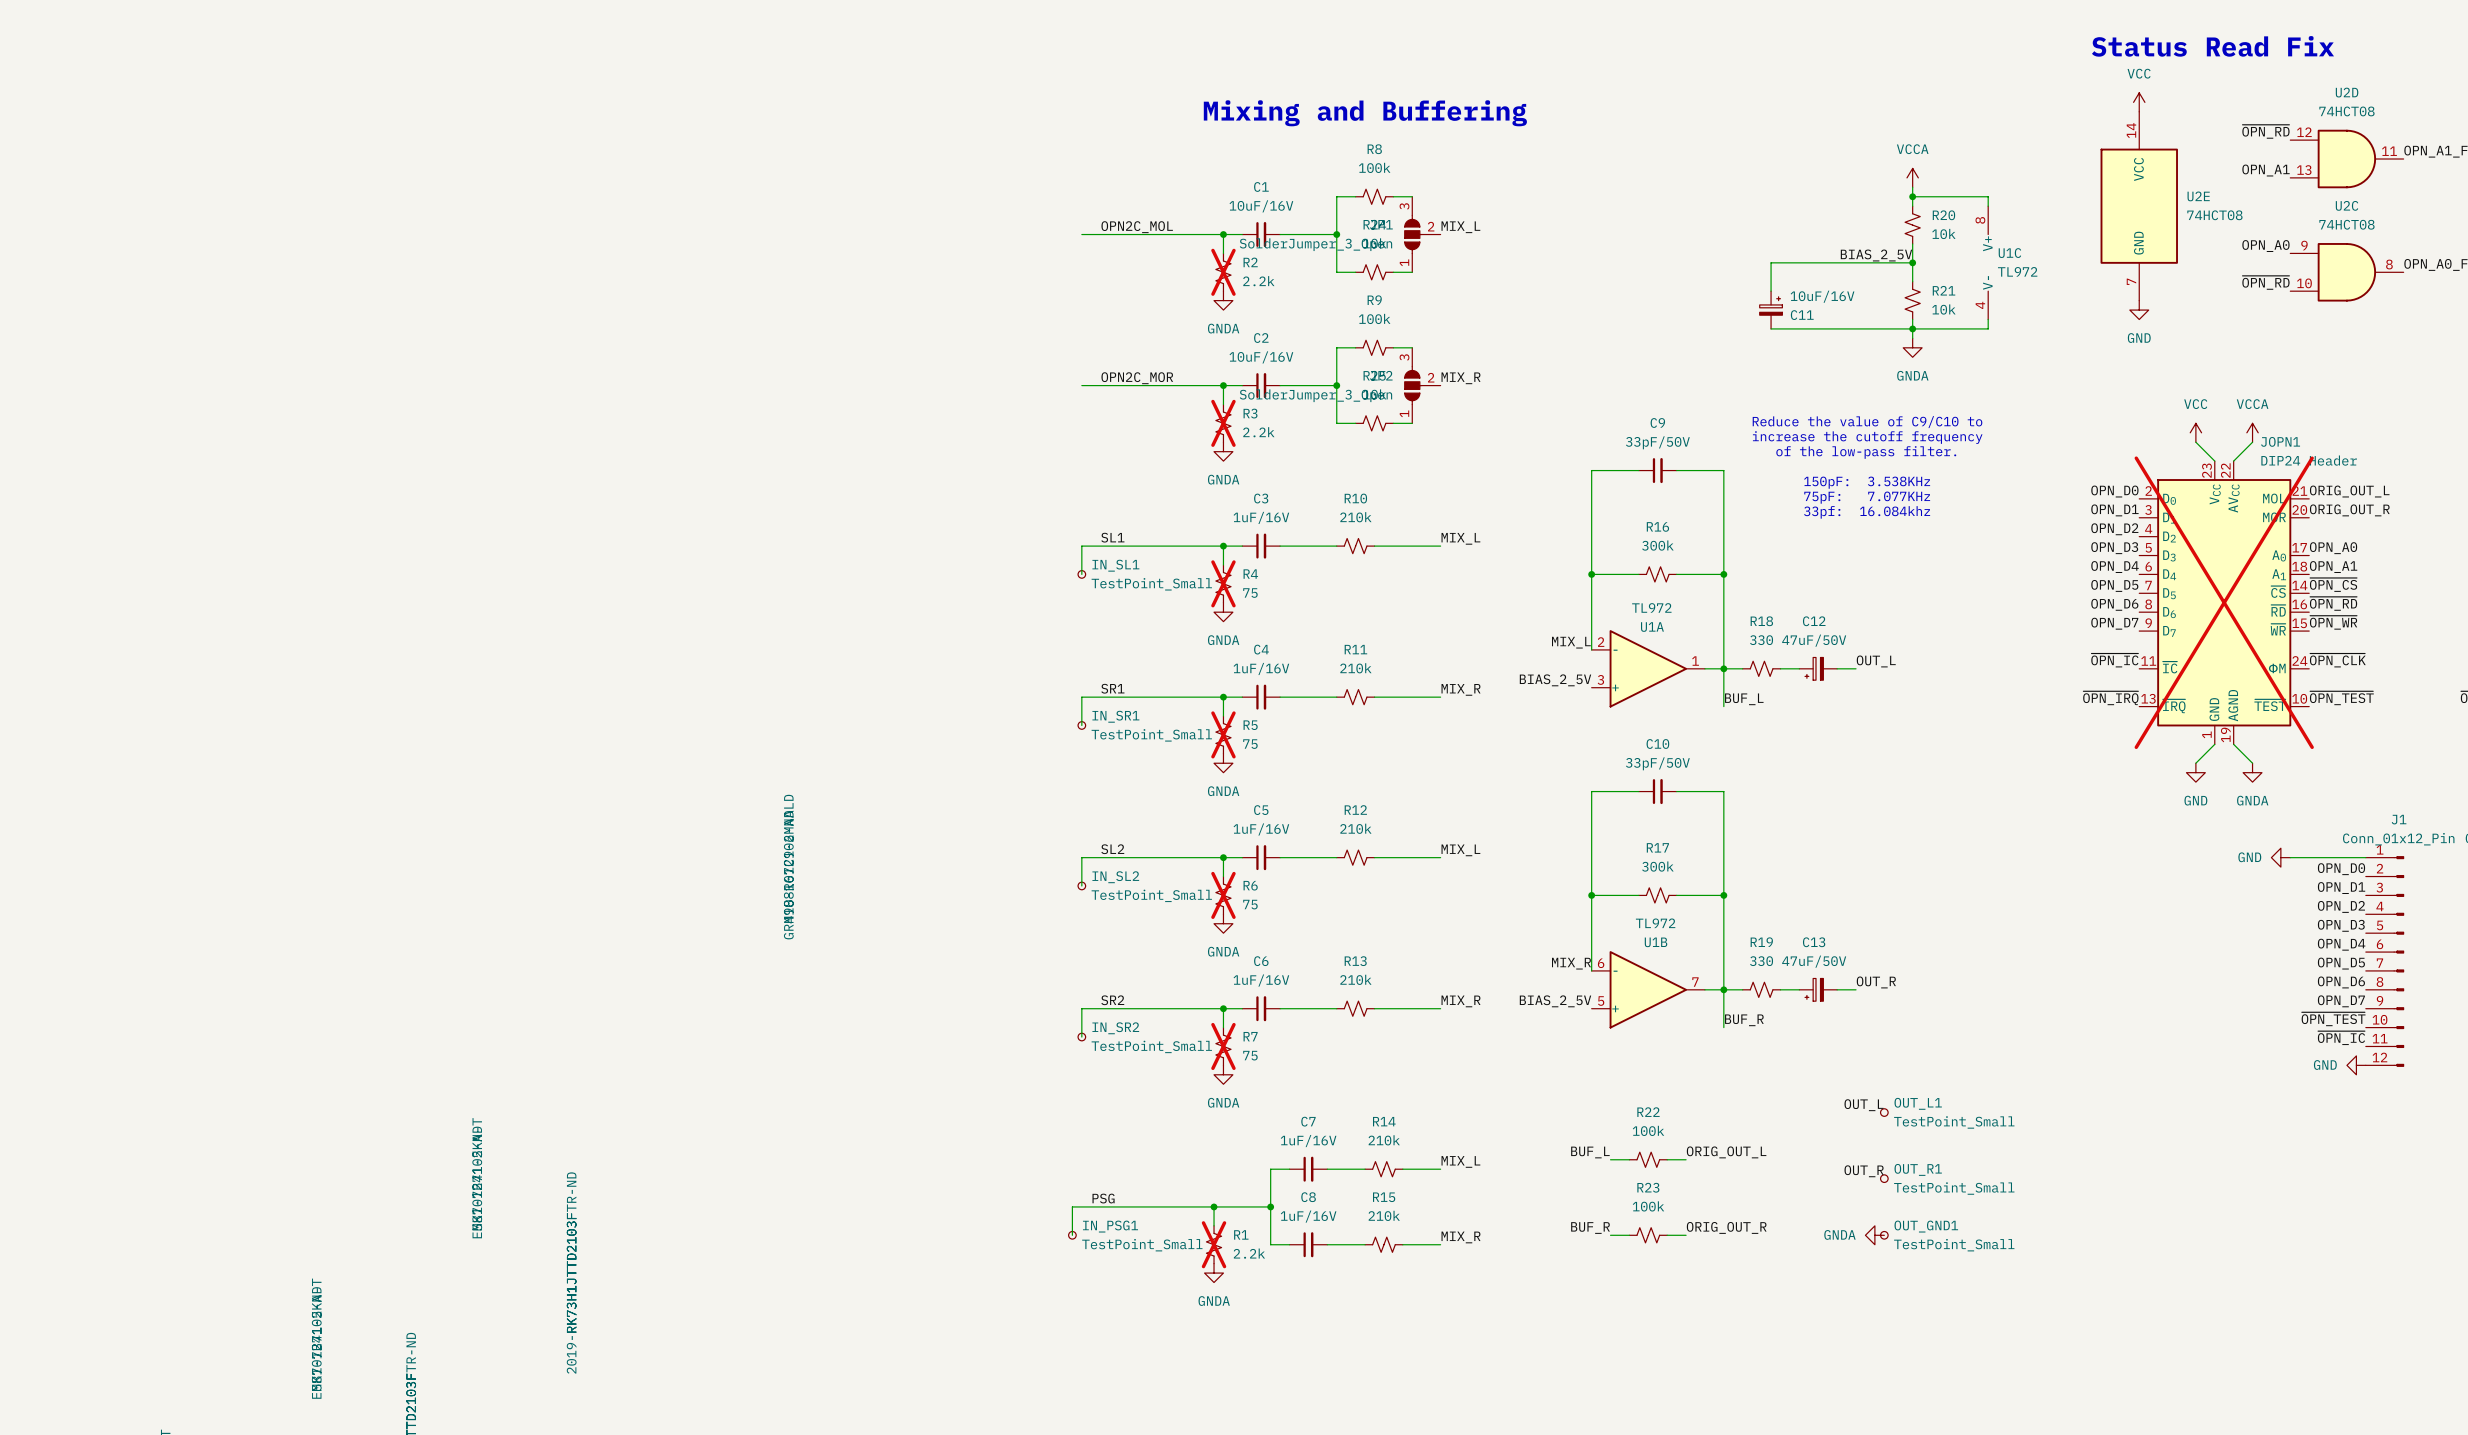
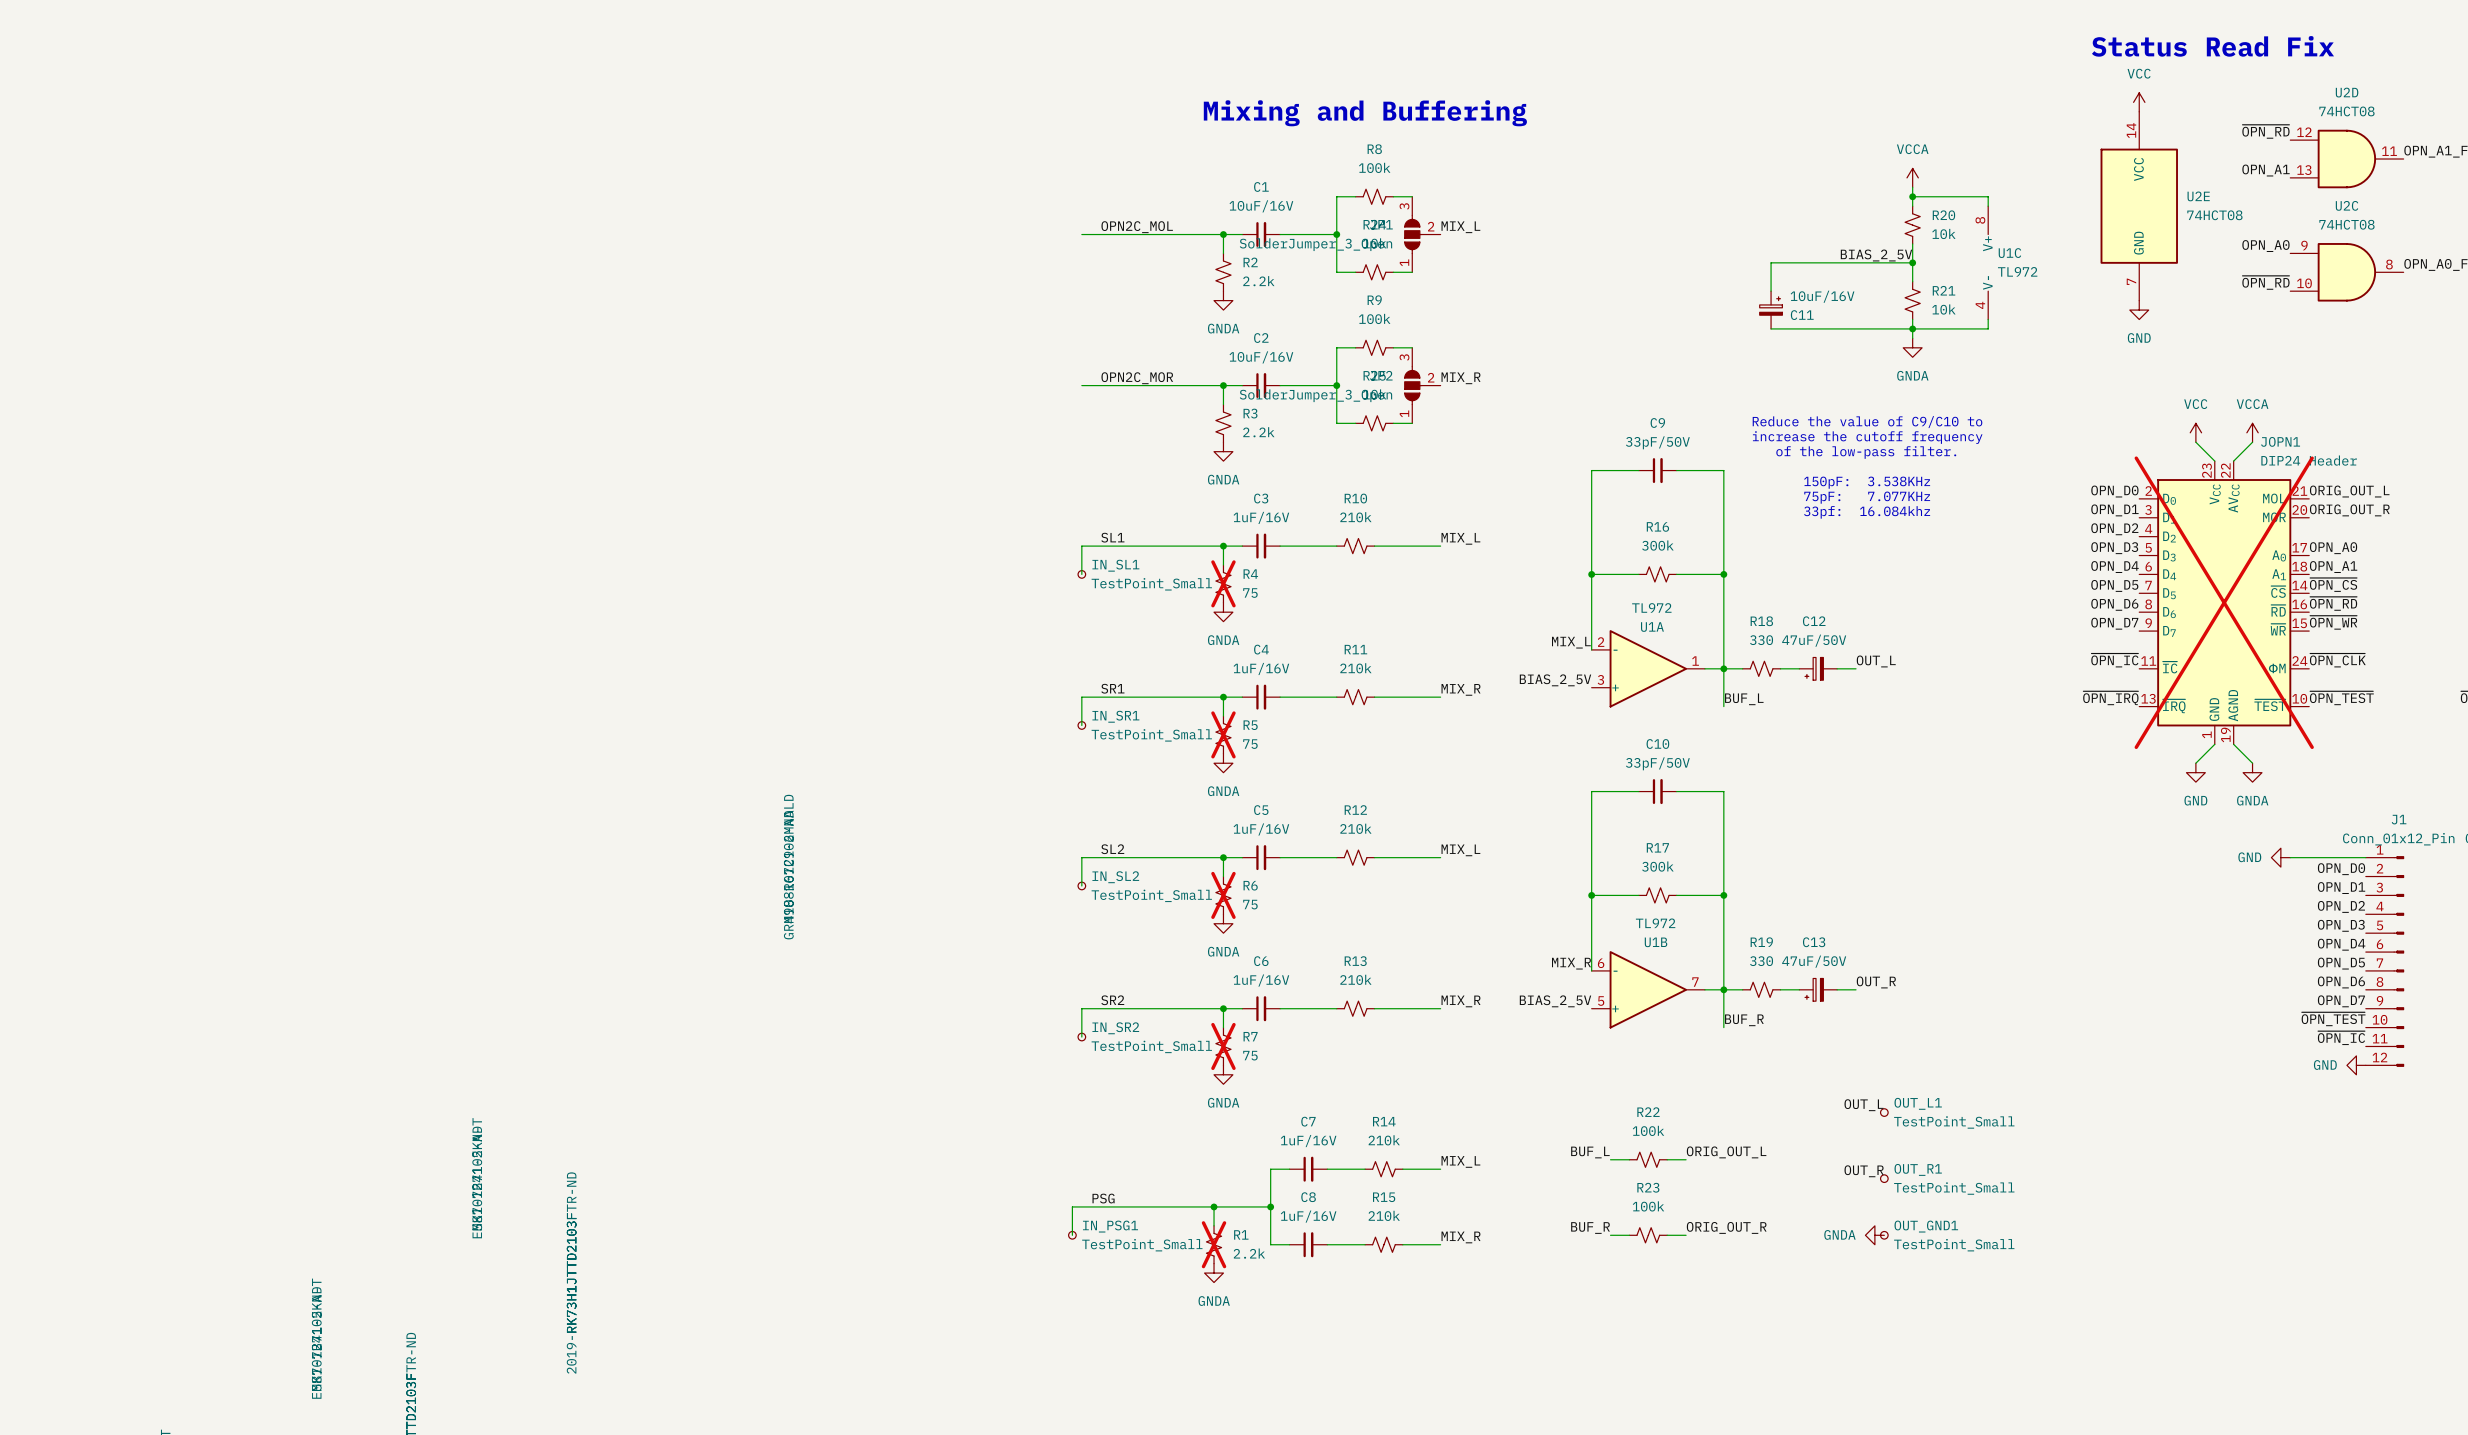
R2 do-not-place cross: (1223, 272) -> none
R3 do-not-place cross: (1223, 423) -> none

